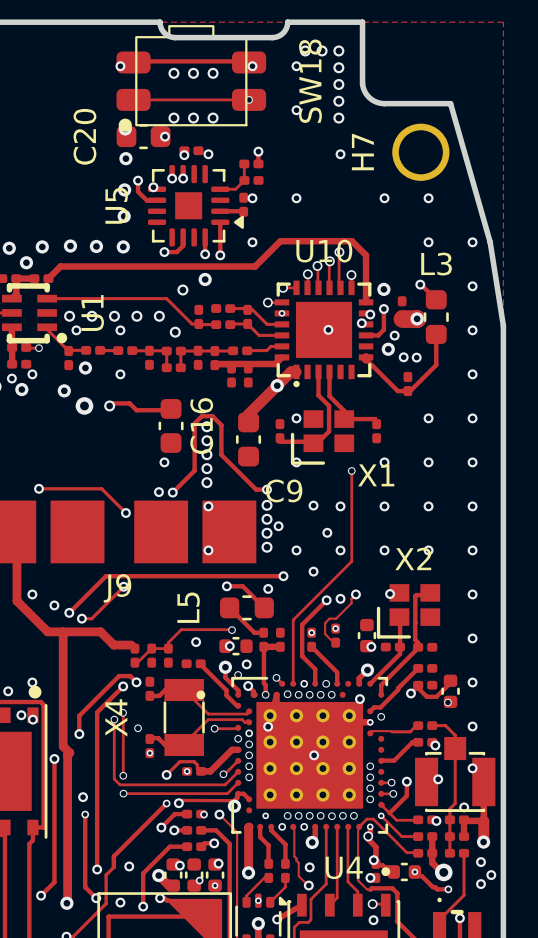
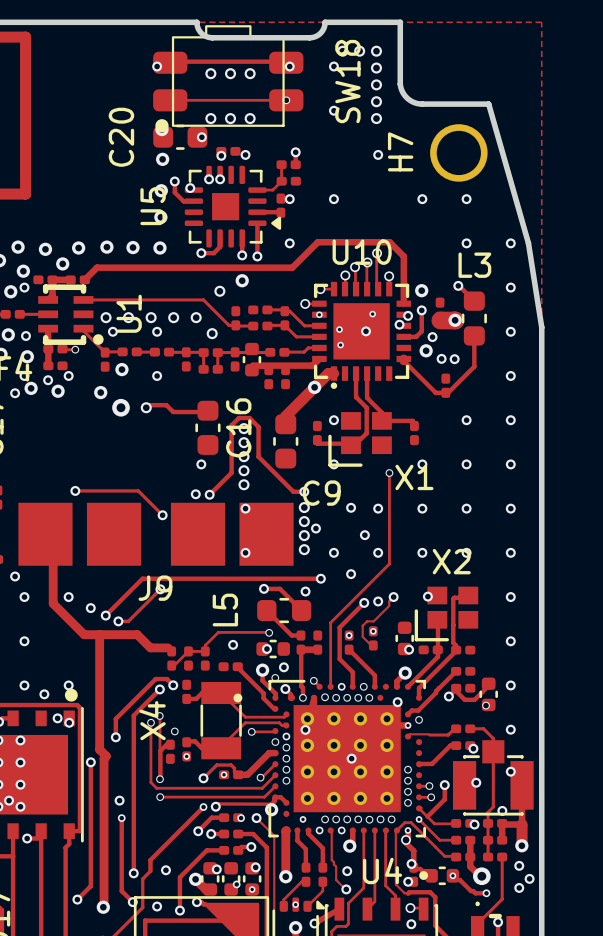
via: none -> (372, 314)
via: none -> (339, 329)
via: none -> (340, 345)
part footprint: [210, 345, 220, 371] -> [242, 342, 262, 377]
track: none -> (170, 744) (167, 744) (160, 750) (159, 779)
part: none -> (170, 751)

